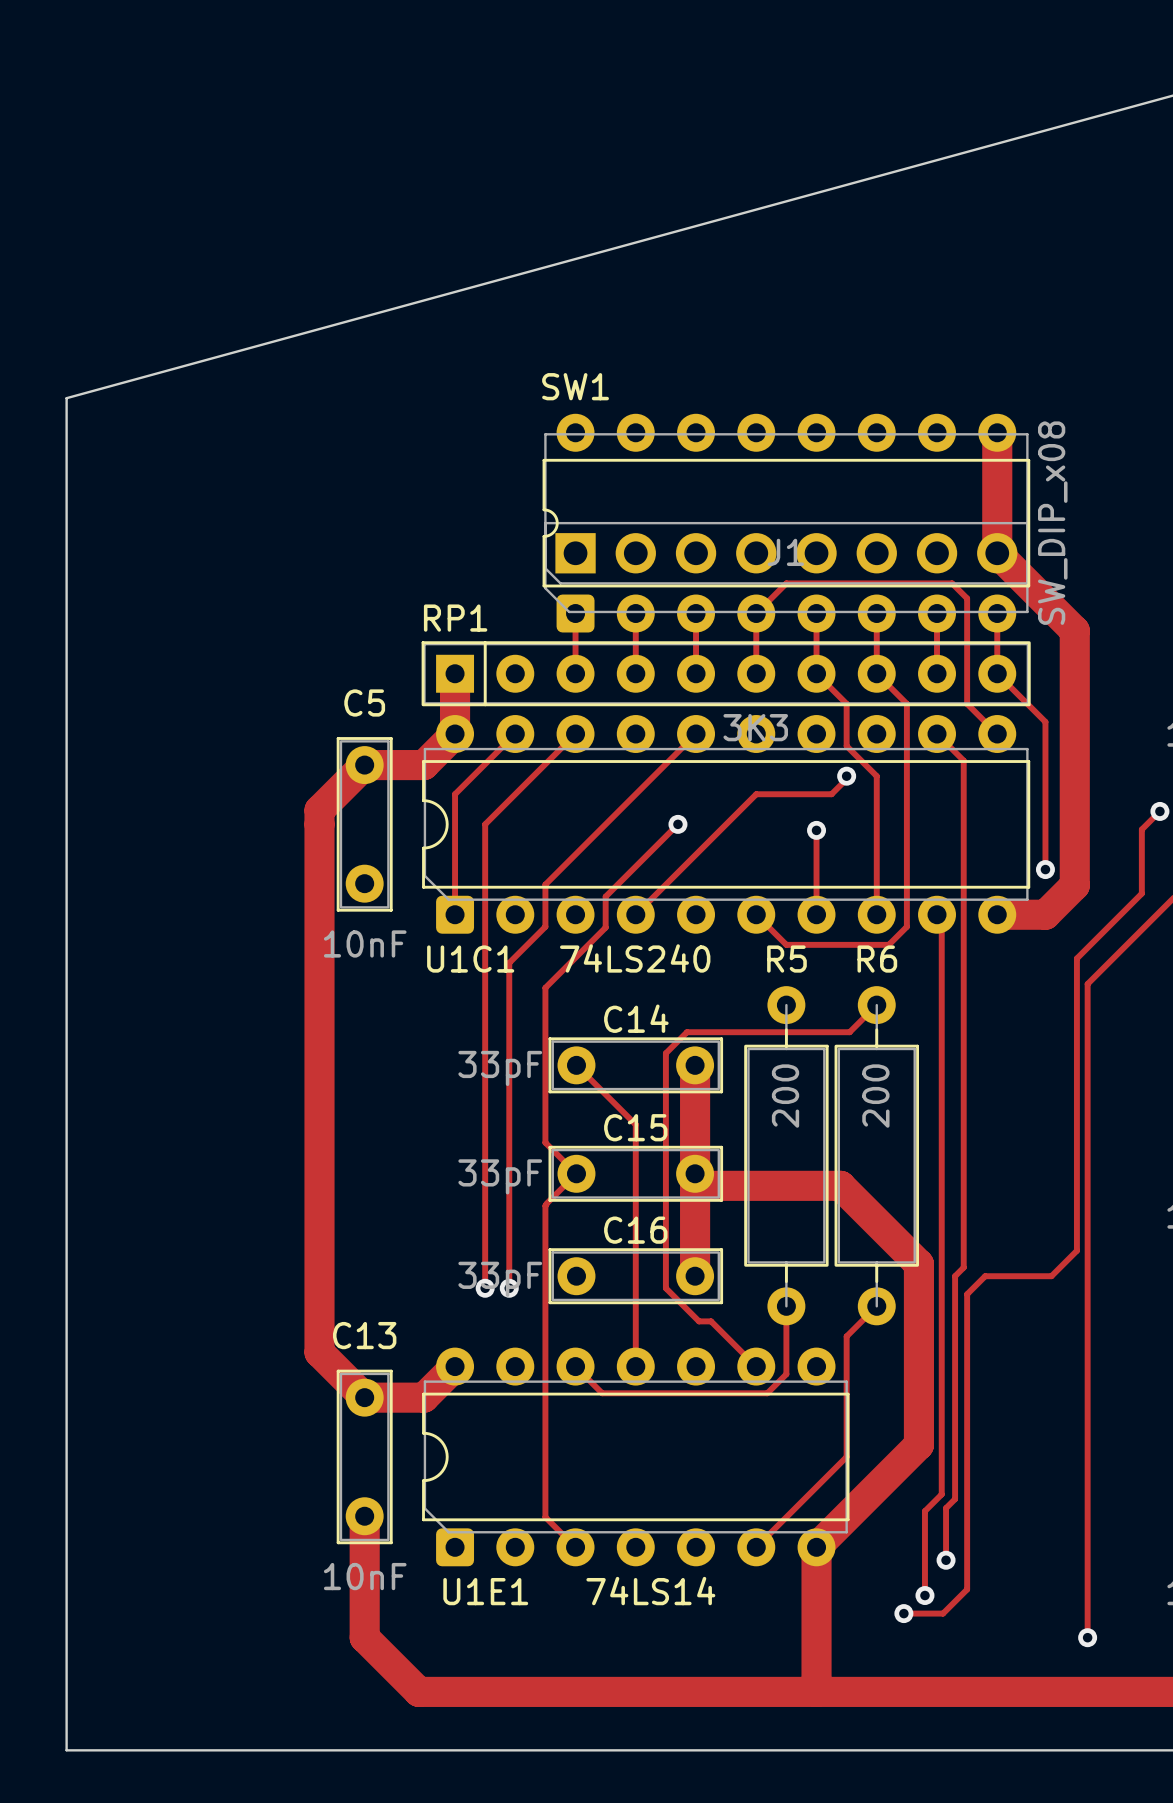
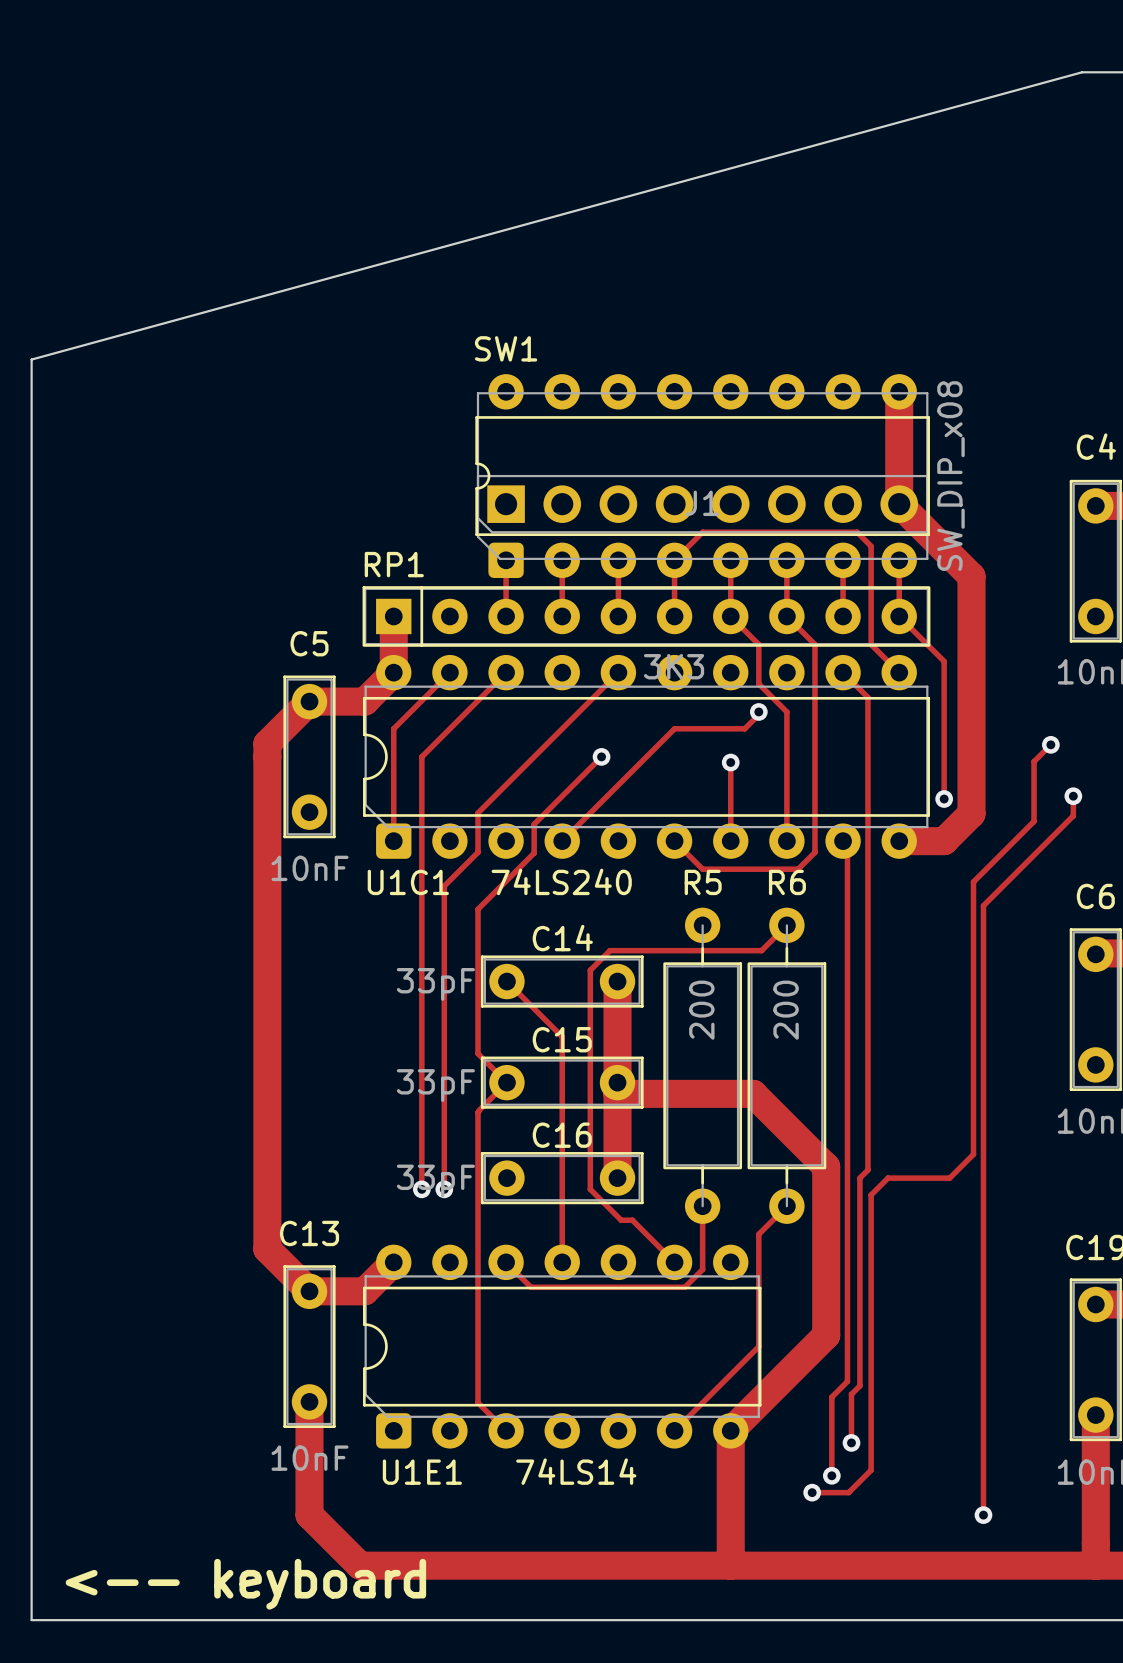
text: none -> <-- keyboard (245, 1584)

